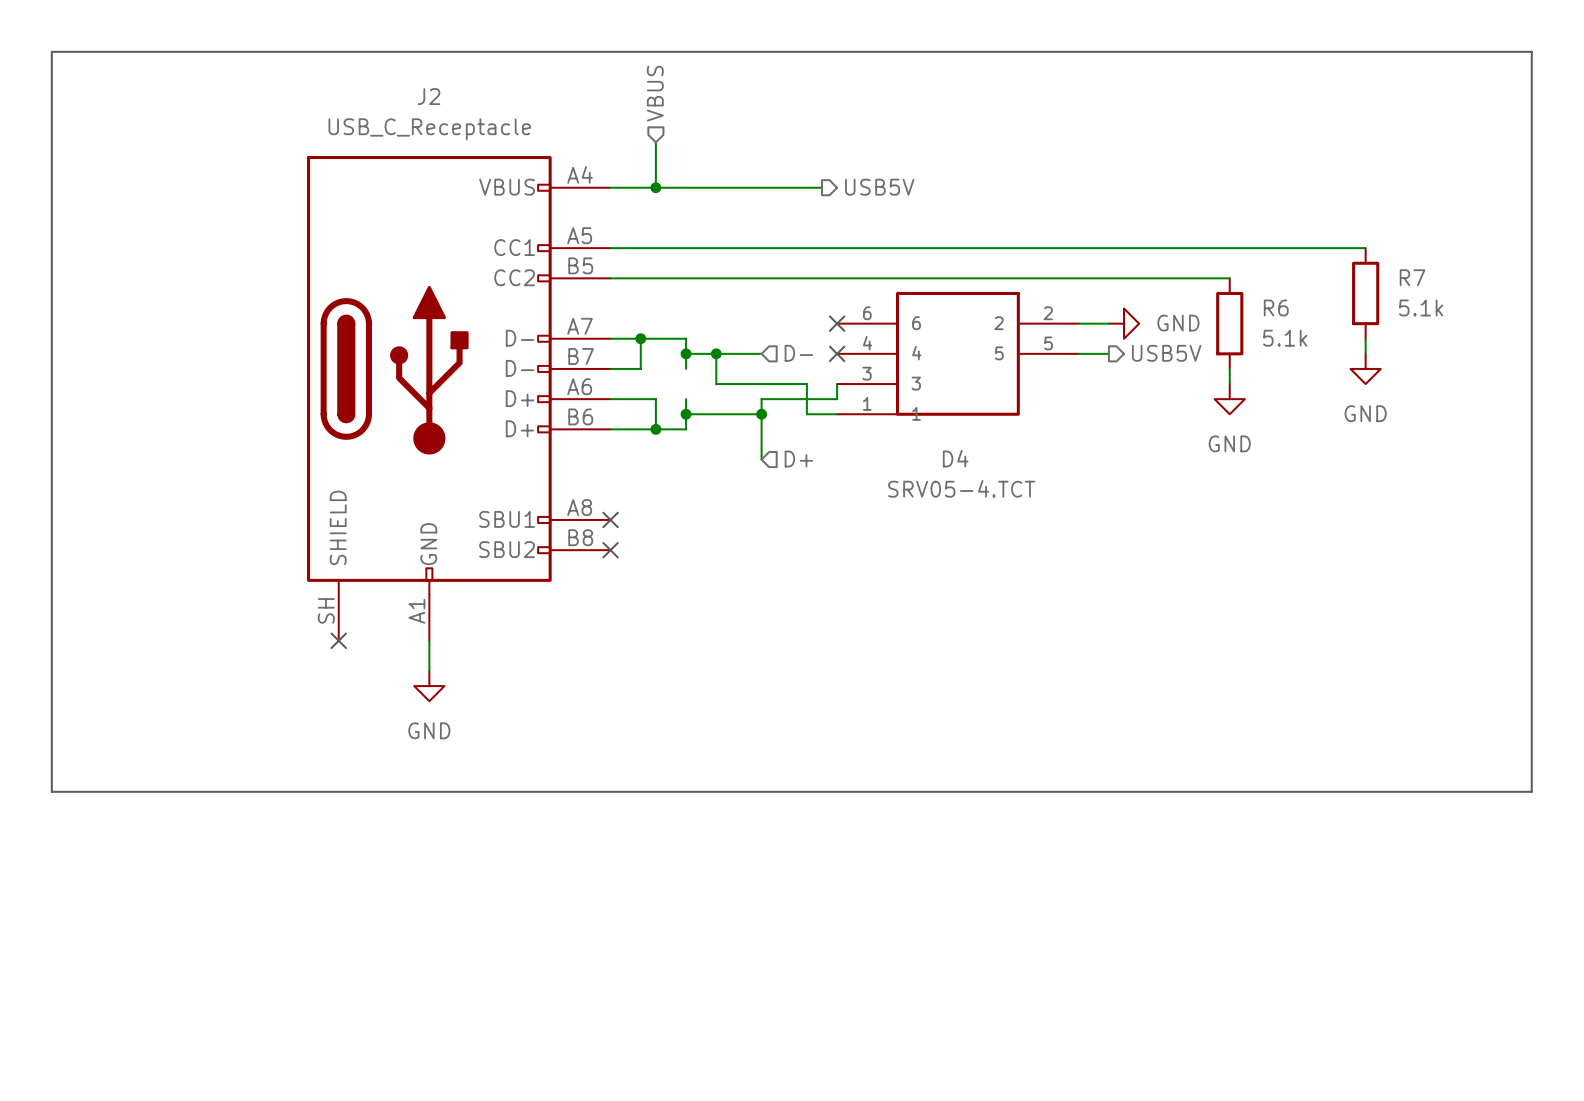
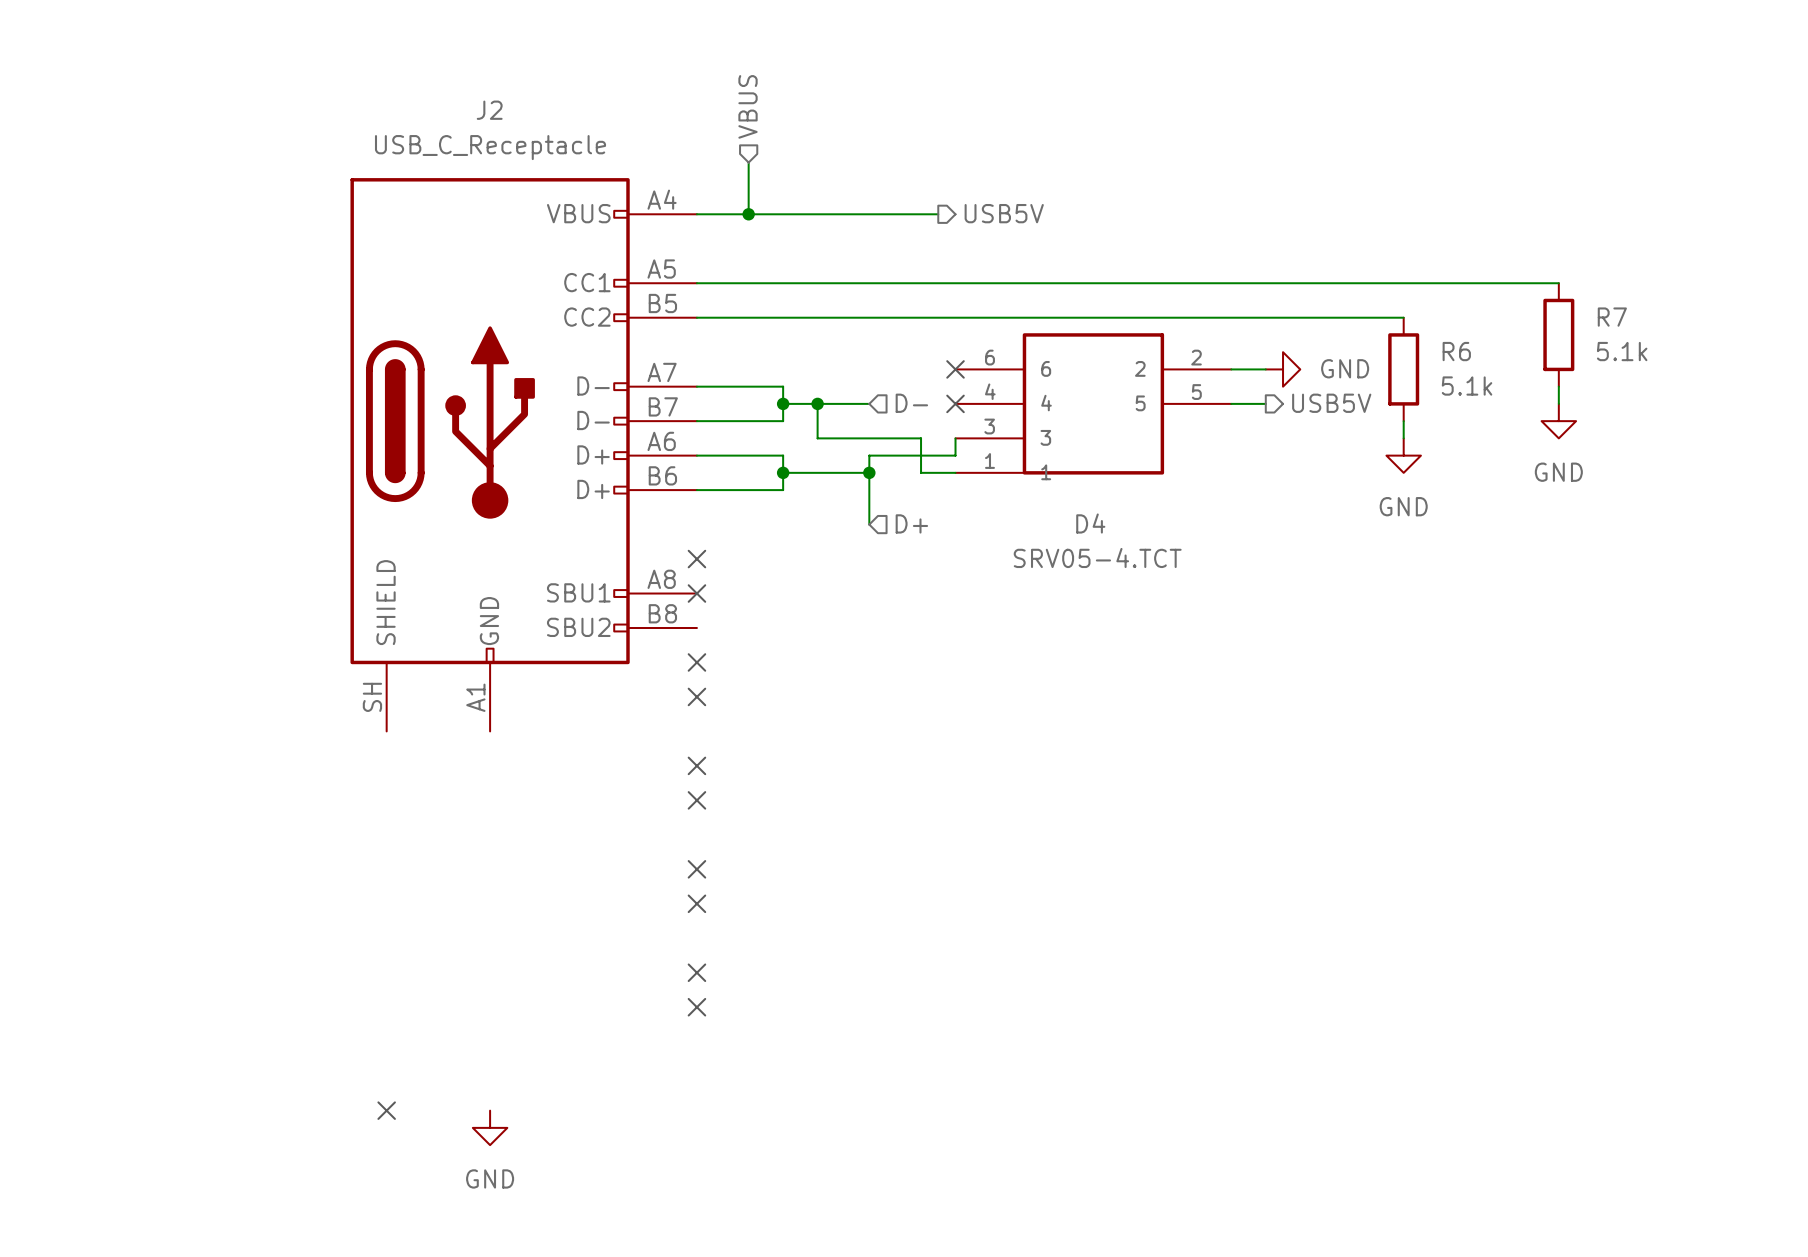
line: (51, 51) (1531, 51) (1531, 791) (51, 791) (51, 51) -> none
wire: (640, 338) (640, 368) -> (783, 421) (731, 421)
junction: (640, 338) -> none
wire: (655, 399) (655, 429) -> (748, 455) (783, 455)
junction: (655, 429) -> none
no-connect mark: none -> (696, 559)
no-connect mark: (610, 550) -> none
no-connect mark: none -> (696, 662)
no-connect mark: none -> (696, 696)
no-connect mark: (338, 640) -> none
wire: (429, 640) (429, 670) -> none
no-connect mark: none -> (696, 765)
power symbol: GND (429, 686) -> none
no-connect mark: none -> (696, 800)
no-connect mark: none -> (696, 869)
no-connect mark: none -> (696, 903)
no-connect mark: none -> (696, 972)
no-connect mark: none -> (696, 1007)
no-connect mark: none -> (386, 1110)
power symbol: none -> GND (490, 1127)

